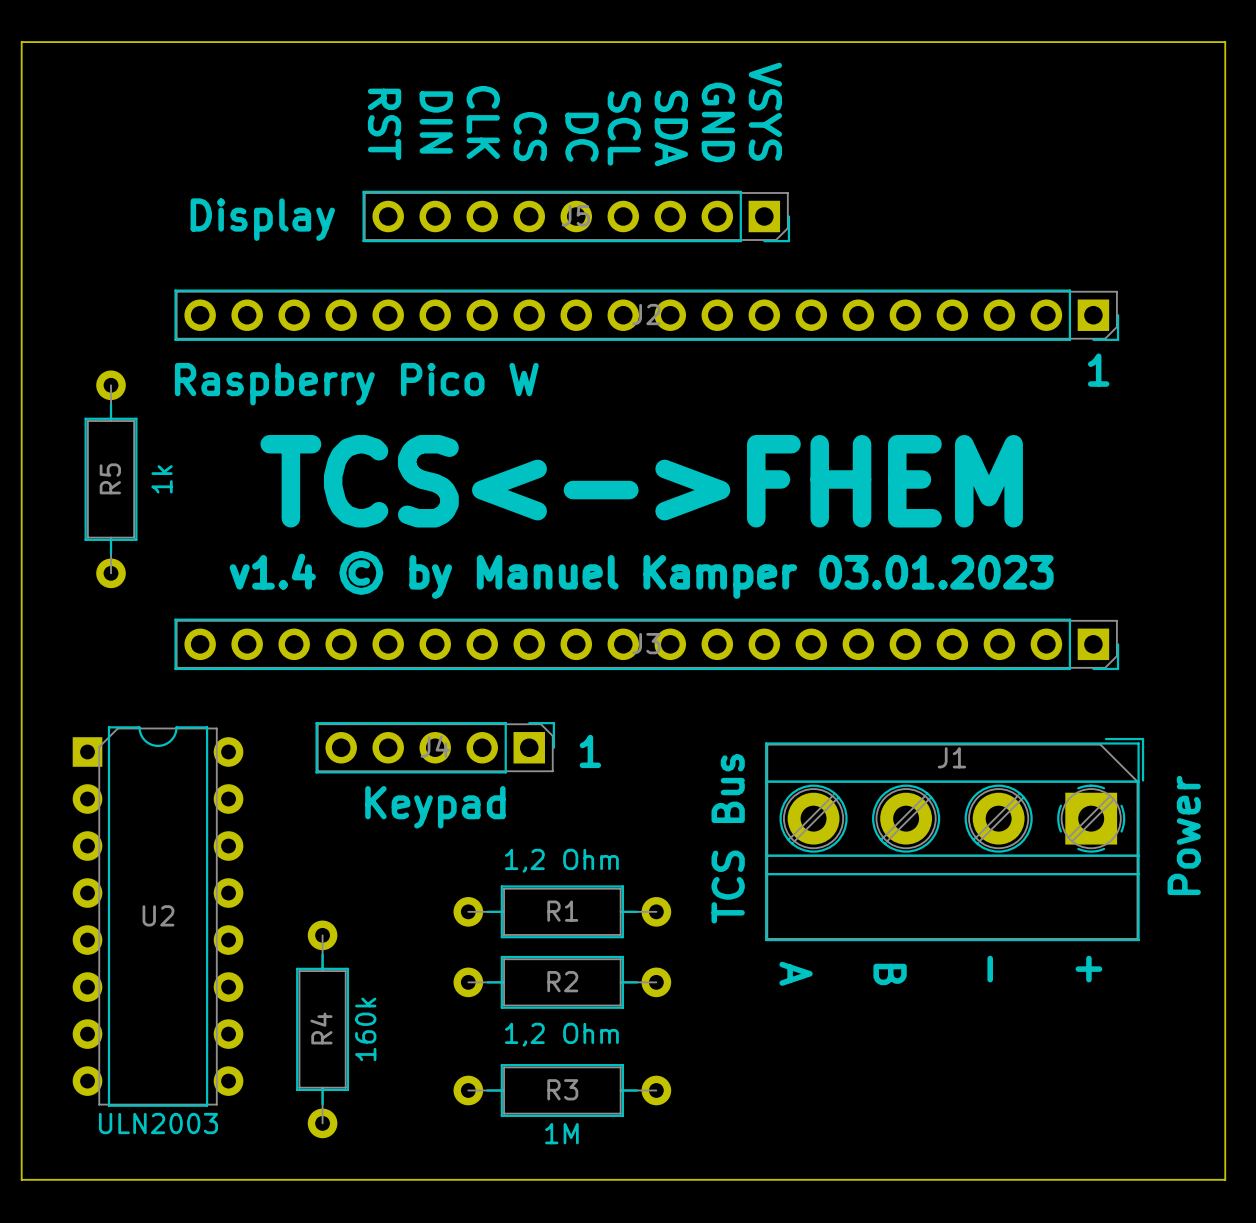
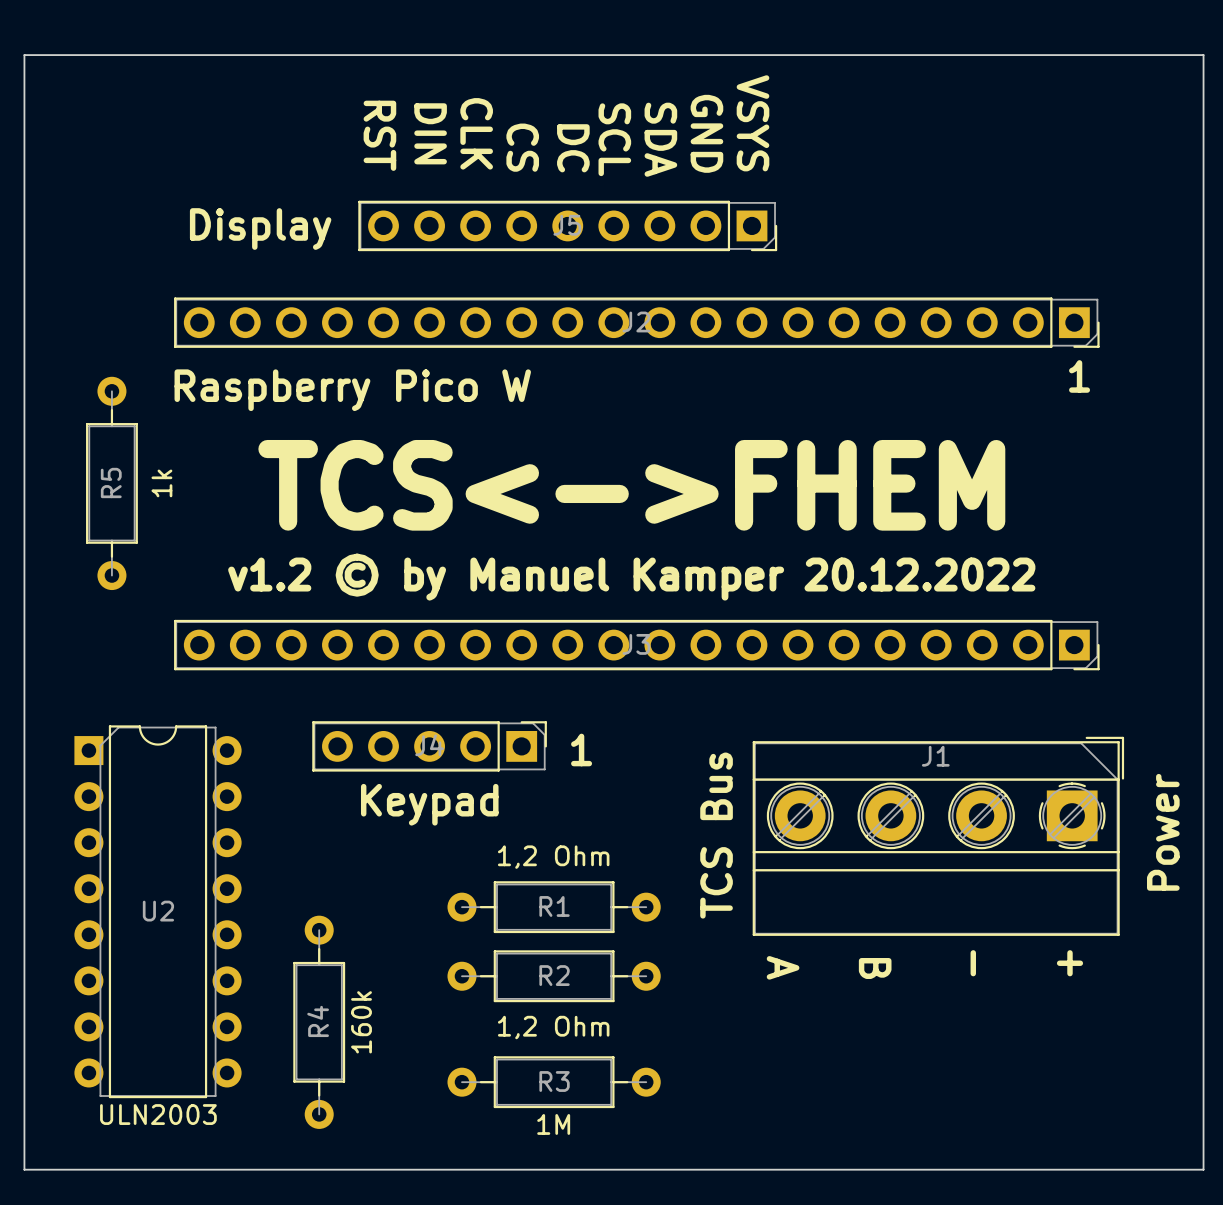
text: v1.4 © by Manuel Kamper 03.01.2023 (641, 574) -> v1.2 © by Manuel Kamper 20.12.2022 (631, 577)

